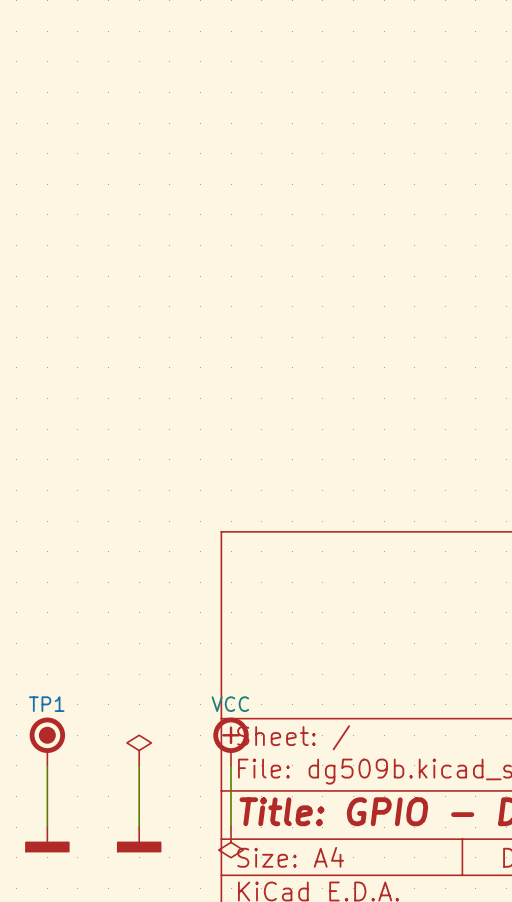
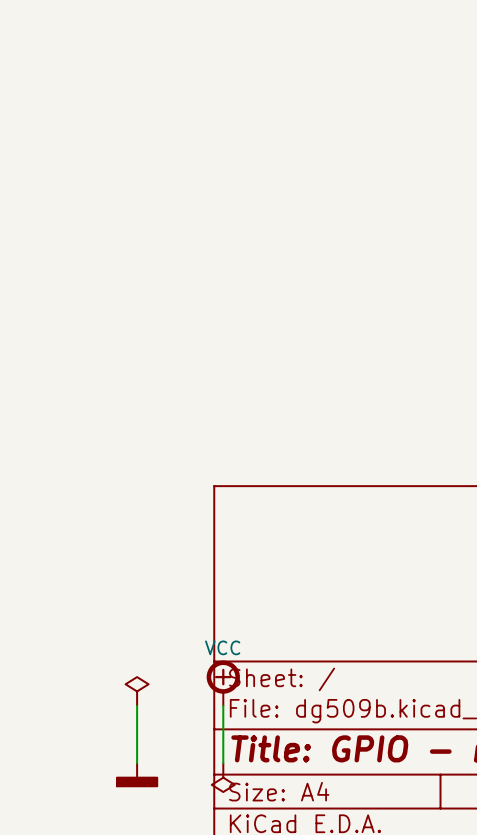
TP1: (47, 741) -> none
wire: (47, 765) (47, 827) -> none
power symbol: (47, 839) -> none

